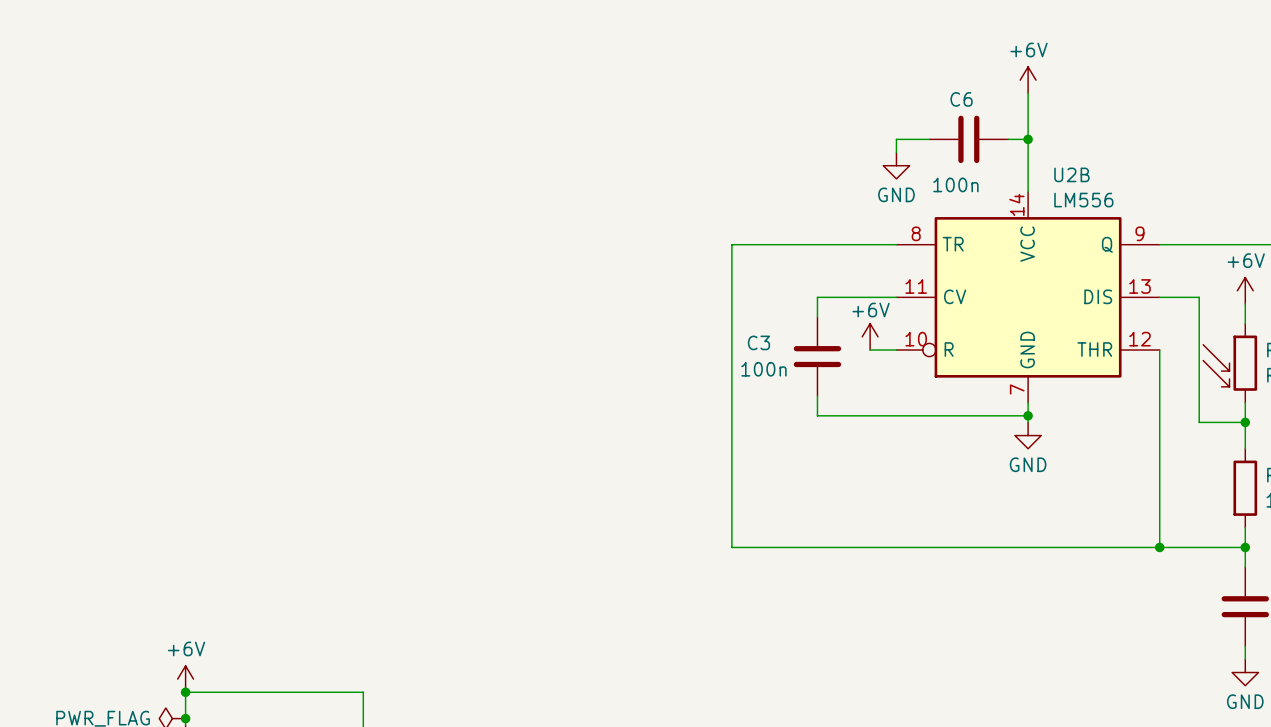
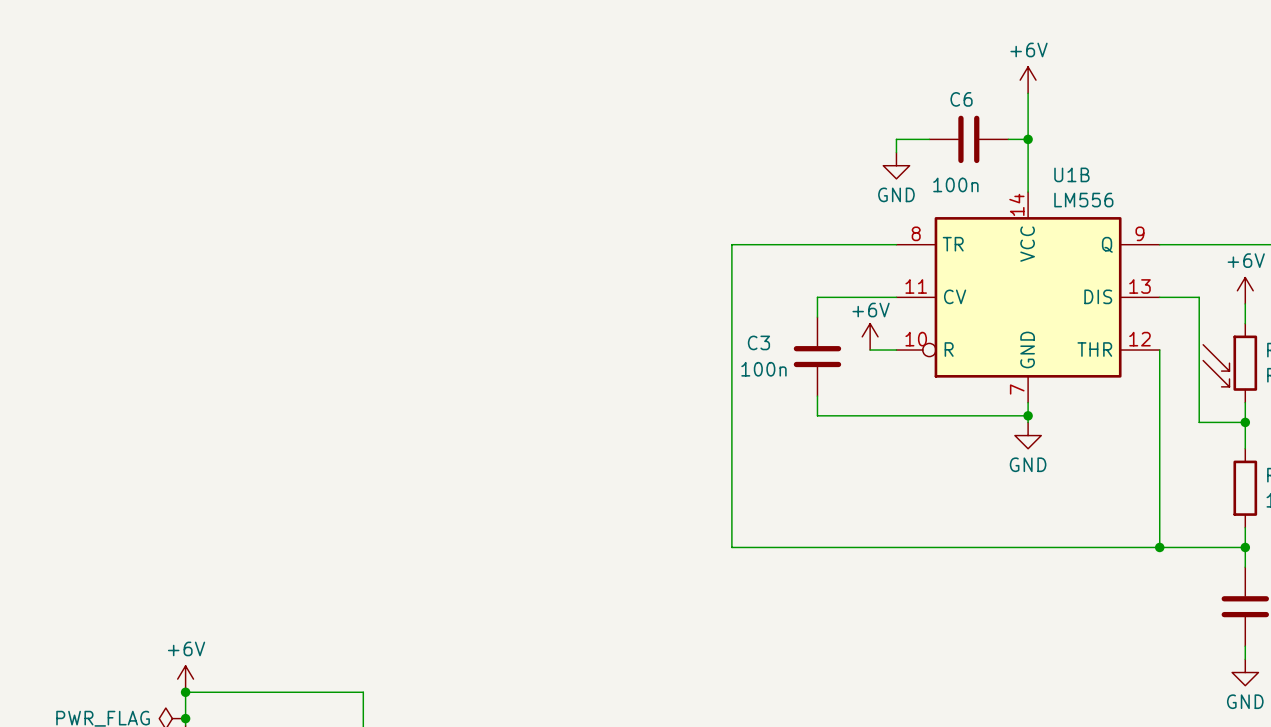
U2B name: U2B (1071, 174) -> U1B (1071, 174)

